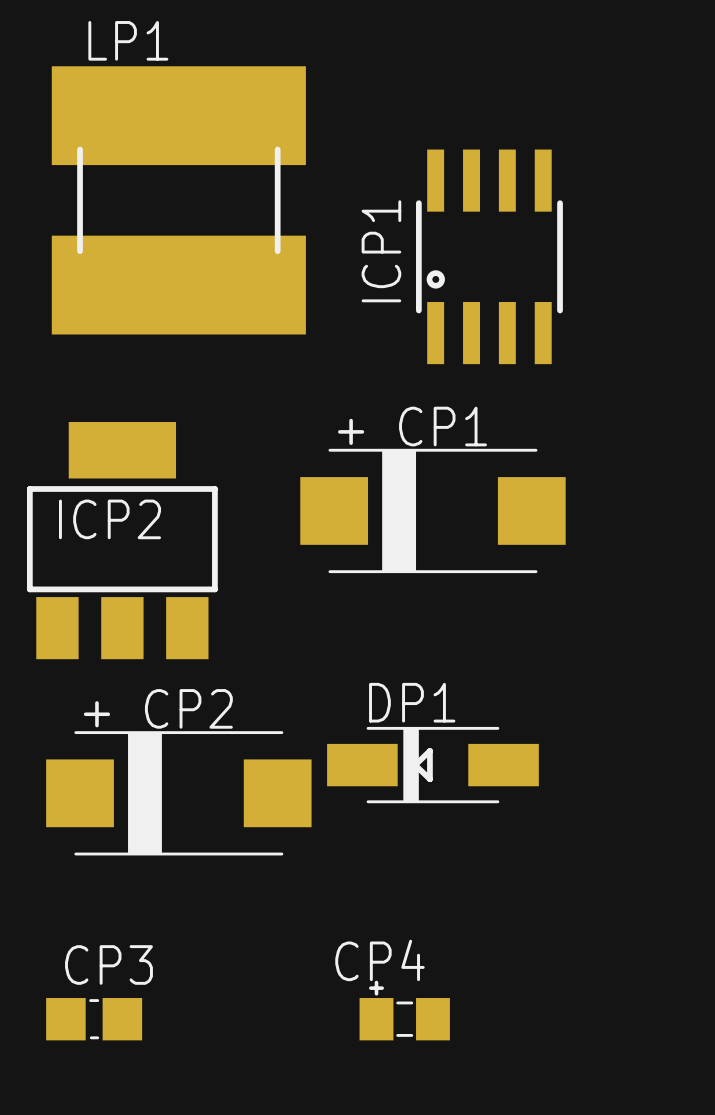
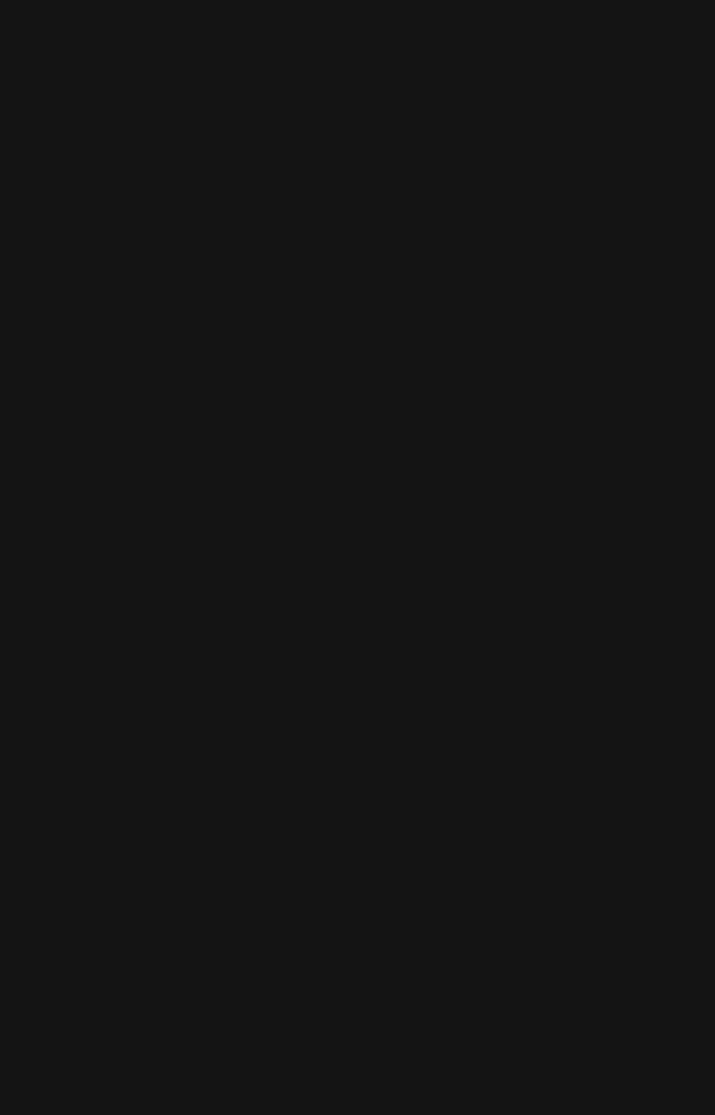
LP1: (178, 200) -> none
ICP1: (489, 256) -> none
CP1: (432, 495) -> none
ICP2: (122, 540) -> none
DP1: (432, 765) -> none
CP2: (178, 778) -> none
CP4: (404, 1010) -> none
CP3: (94, 1019) -> none

